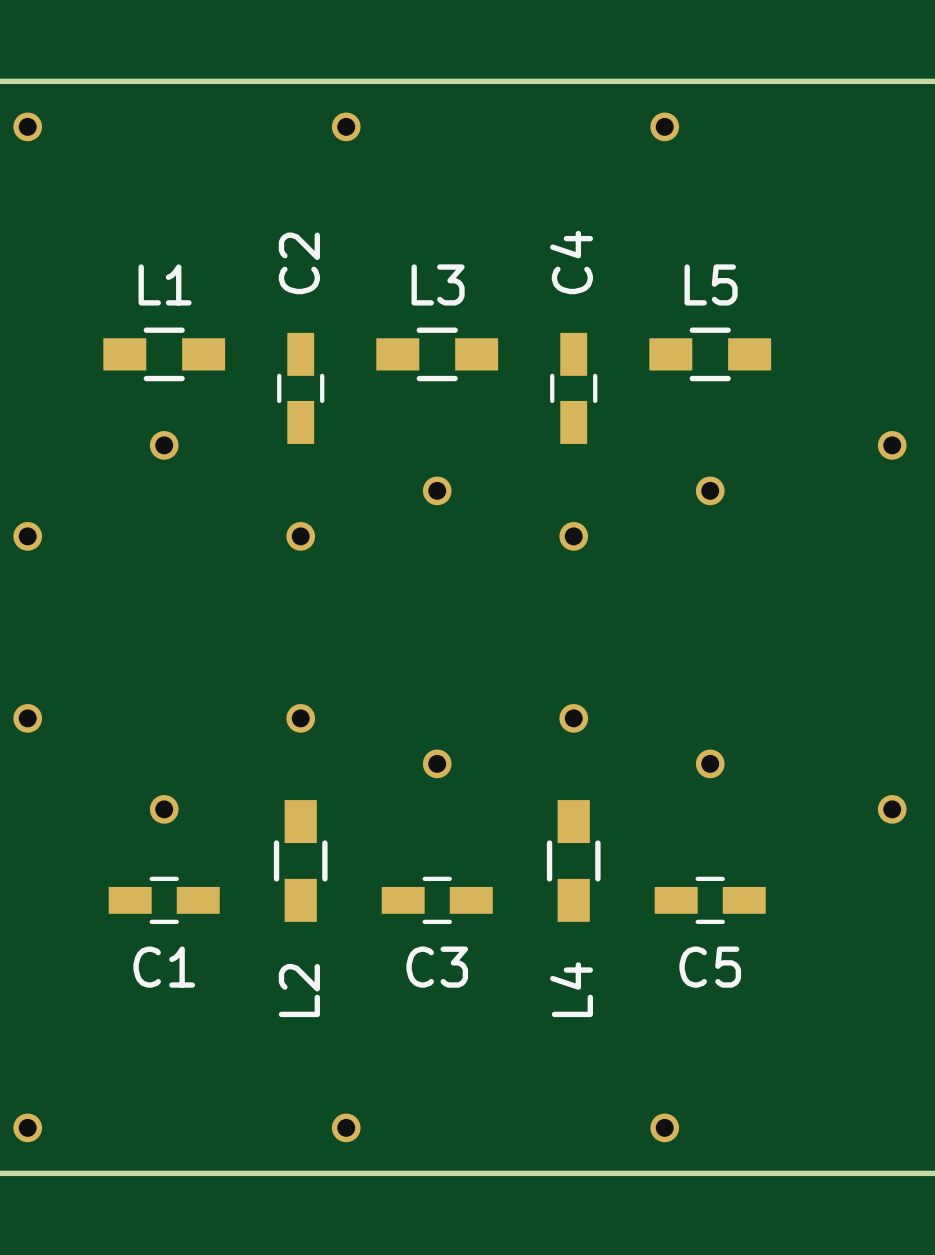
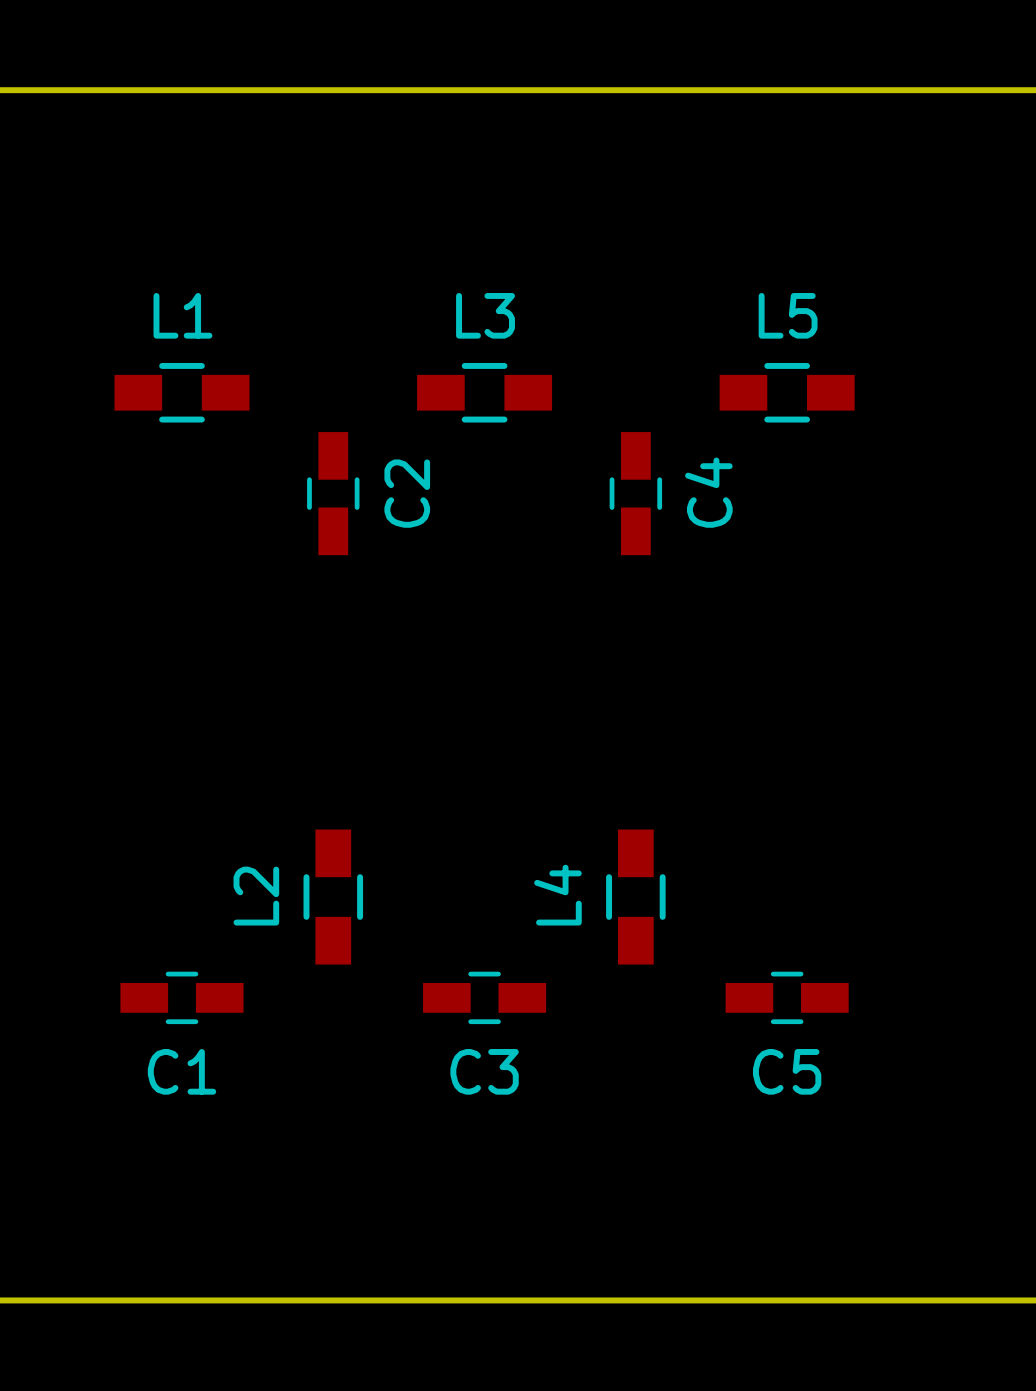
part: (27, 126) -> none
part: (346, 126) -> none
part: (664, 126) -> none
C4 name position: C4 (571, 262) -> C4 (708, 492)
C2 name position: C2 (299, 263) -> C2 (407, 493)
C2 position: (300, 388) -> (333, 493)
C4 position: (573, 388) -> (635, 493)
part: (164, 445) -> none
part: (892, 445) -> none
part: (437, 490) -> none
part: (710, 490) -> none
part: (27, 536) -> none
part: (300, 536) -> none
part: (573, 536) -> none
part: (27, 718) -> none
part: (300, 718) -> none
part: (573, 718) -> none
part: (437, 763) -> none
part: (710, 763) -> none
part: (164, 809) -> none
part: (892, 809) -> none
L2 position: (300, 860) -> (333, 897)
L4 position: (573, 860) -> (635, 897)
L4 name position: L4 (571, 989) -> L4 (557, 895)
L2 name position: L2 (299, 990) -> L2 (256, 896)
part: (27, 1127) -> none
part: (346, 1127) -> none
part: (664, 1127) -> none

